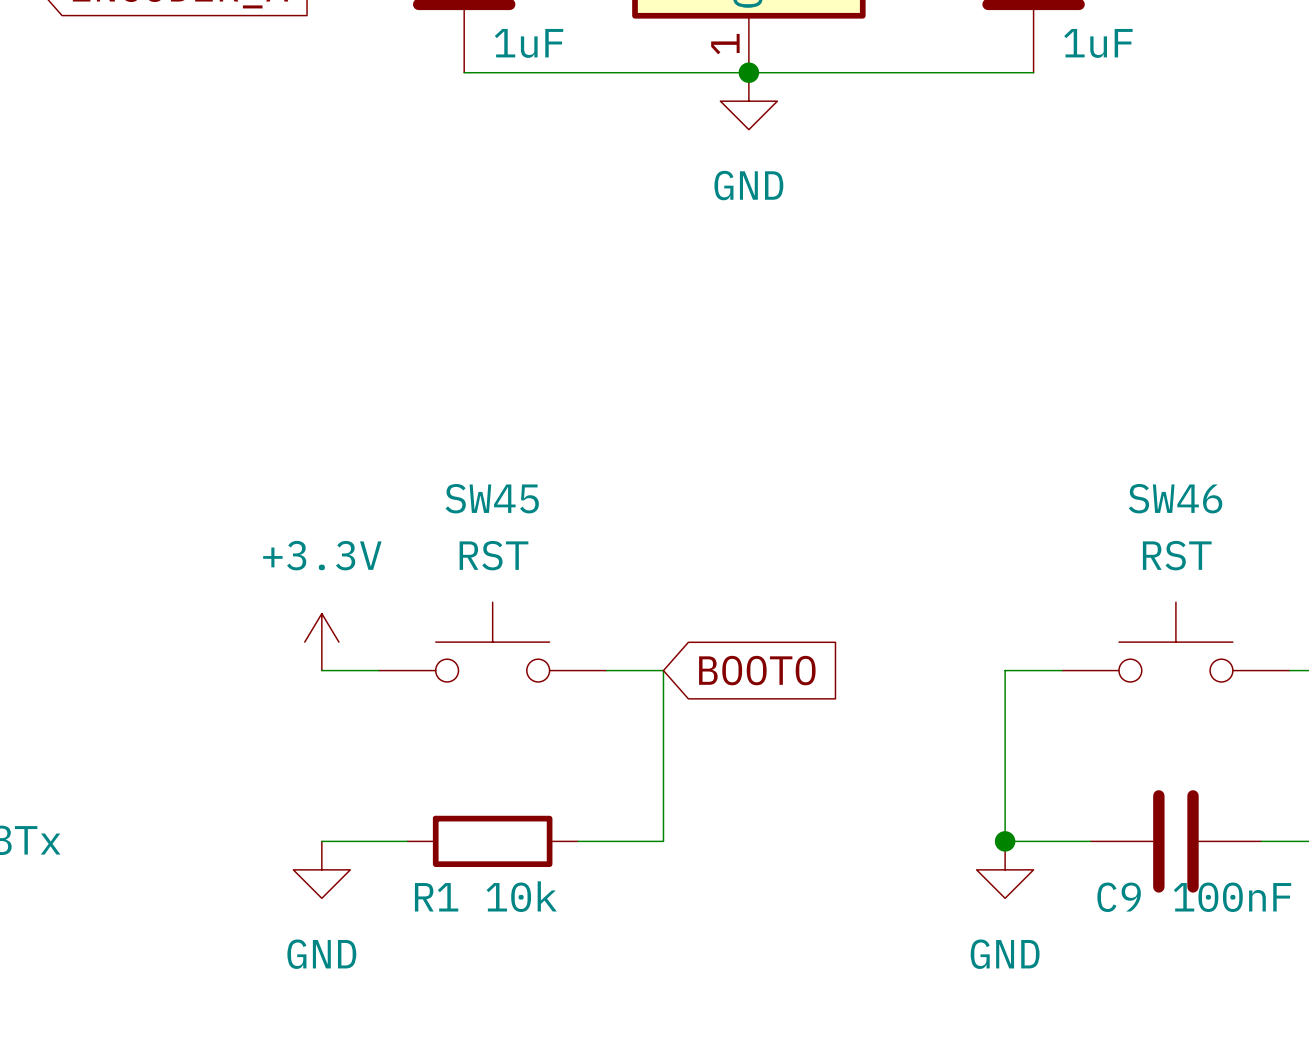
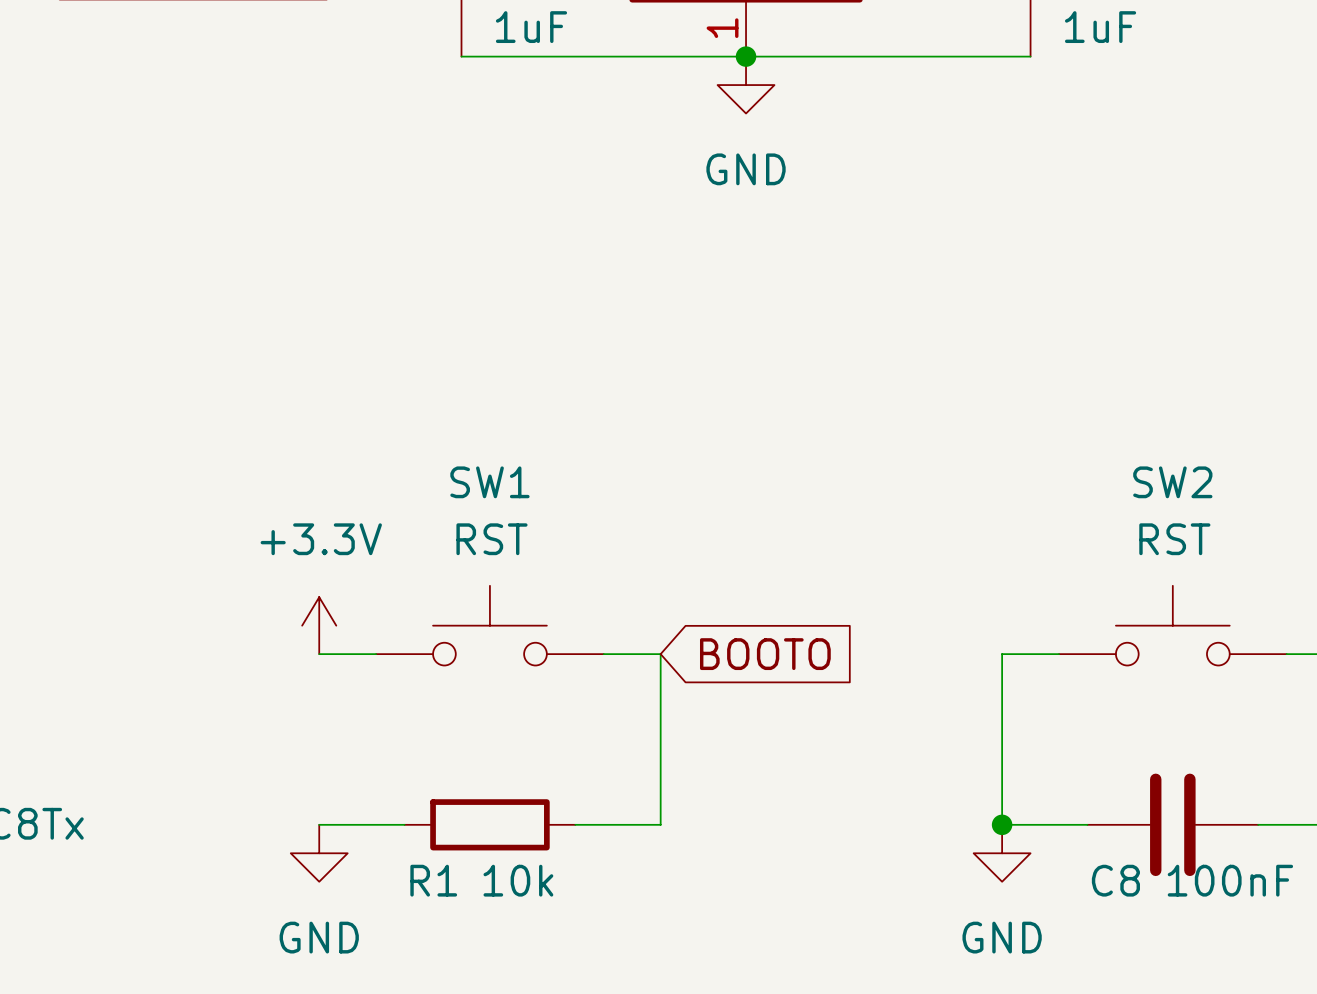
SW45 name: SW45 (492, 498) -> SW1 (489, 482)
SW46 name: SW46 (1175, 498) -> SW2 (1172, 482)
C9 name: C9 (1119, 897) -> C8 (1115, 880)

